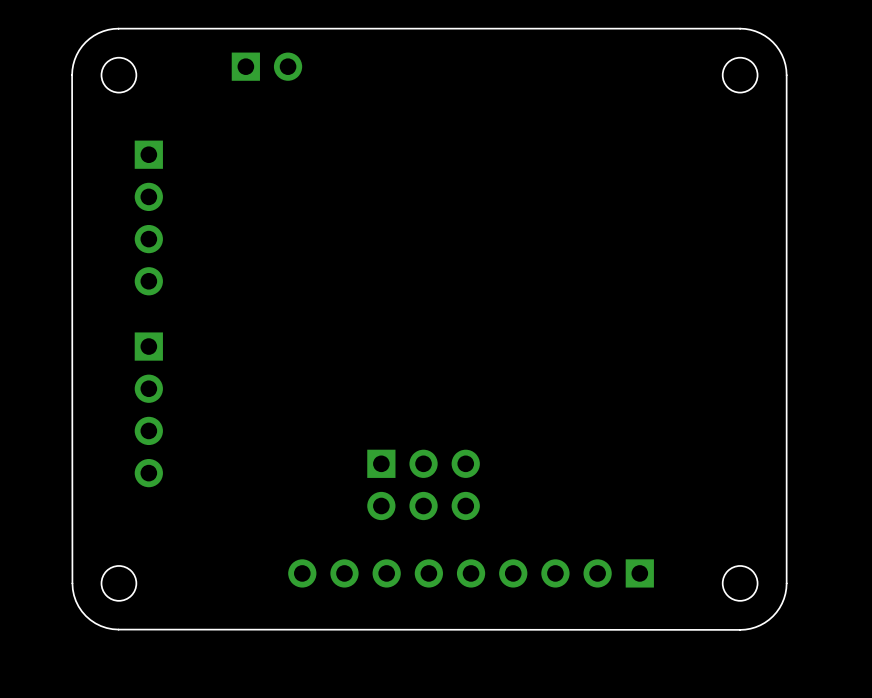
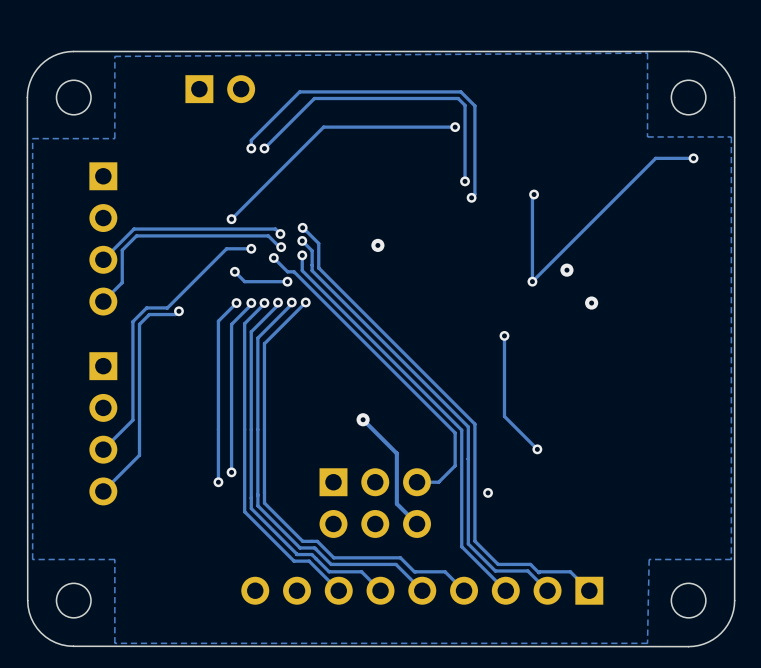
zone outline: none -> (647, 53) (647, 136) (731, 136) (731, 559) (649, 559) (647, 643) (114, 643) (114, 559) (32, 559) (32, 138) (114, 138) (114, 56) (647, 53)
track: none -> (455, 127) (323, 127) (231, 219)
via: none -> (455, 127)
track: none -> (251, 148) (251, 140) (299, 91) (460, 91) (474, 105) (474, 194) (471, 197)
via: none -> (251, 148)
track: none -> (264, 148) (314, 98) (458, 98) (465, 105) (465, 181)
via: none -> (264, 148)
track: none -> (693, 158) (655, 158) (532, 281) (532, 196) (534, 194)
via: none -> (693, 158)
via: none -> (465, 181)
via: none -> (534, 194)
via: none -> (471, 197)
via: none -> (231, 219)
track: none -> (302, 227) (302, 231) (306, 231) (318, 243) (318, 267) (474, 424) (474, 541) (498, 564) (530, 564) (538, 572) (570, 571) (589, 590)
via: none -> (302, 227)
track: none -> (280, 233) (275, 229) (134, 229) (103, 259)
via: none -> (280, 233)
track: none -> (302, 240) (312, 250) (312, 270) (468, 426) (468, 543) (495, 571) (527, 571) (547, 590)
via: none -> (302, 240)
via: none -> (377, 245)
track: none -> (281, 247) (268, 235) (136, 235) (122, 250) (122, 282) (103, 301)
via: none -> (281, 247)
track: none -> (251, 248) (226, 248) (167, 307) (146, 307) (132, 321) (132, 420) (103, 449)
via: none -> (251, 248)
track: none -> (302, 255) (302, 270) (461, 430) (461, 546) (505, 590)
via: none -> (302, 255)
track: none -> (273, 258) (287, 271) (294, 271) (455, 432) (455, 465) (438, 482) (417, 482)
via: none -> (273, 258)
via: none -> (566, 270)
track: none -> (234, 271) (244, 281) (287, 281)
via: none -> (234, 271)
via: none -> (287, 281)
via: none -> (532, 281)
track: none -> (236, 303) (218, 321) (218, 482)
via: none -> (236, 303)
track: none -> (251, 303) (231, 324) (231, 472)
via: none -> (251, 303)
track: none -> (264, 303) (244, 323) (244, 511) (294, 561) (309, 561) (338, 590)
via: none -> (264, 303)
track: none -> (278, 302) (278, 305) (251, 331) (251, 508) (296, 554) (311, 554) (329, 571) (361, 571) (380, 590)
via: none -> (278, 302)
track: none -> (291, 302) (257, 338) (257, 505) (300, 547) (314, 547) (331, 564) (395, 564) (422, 590)
via: none -> (291, 302)
track: none -> (305, 302) (264, 343) (264, 503) (302, 541) (317, 541) (333, 557) (400, 557) (414, 571) (445, 571) (464, 590)
via: none -> (305, 302)
via: none -> (591, 303)
track: none -> (178, 311) (175, 314) (149, 314) (139, 324) (139, 455) (103, 491)
via: none -> (178, 311)
track: none -> (504, 335) (504, 416) (537, 449)
via: none -> (504, 335)
track: none -> (363, 419) (396, 453) (396, 503) (417, 523)
via: none -> (363, 419)
via: none -> (537, 449)
via: none -> (231, 472)
via: none -> (218, 482)
via: none -> (488, 492)

